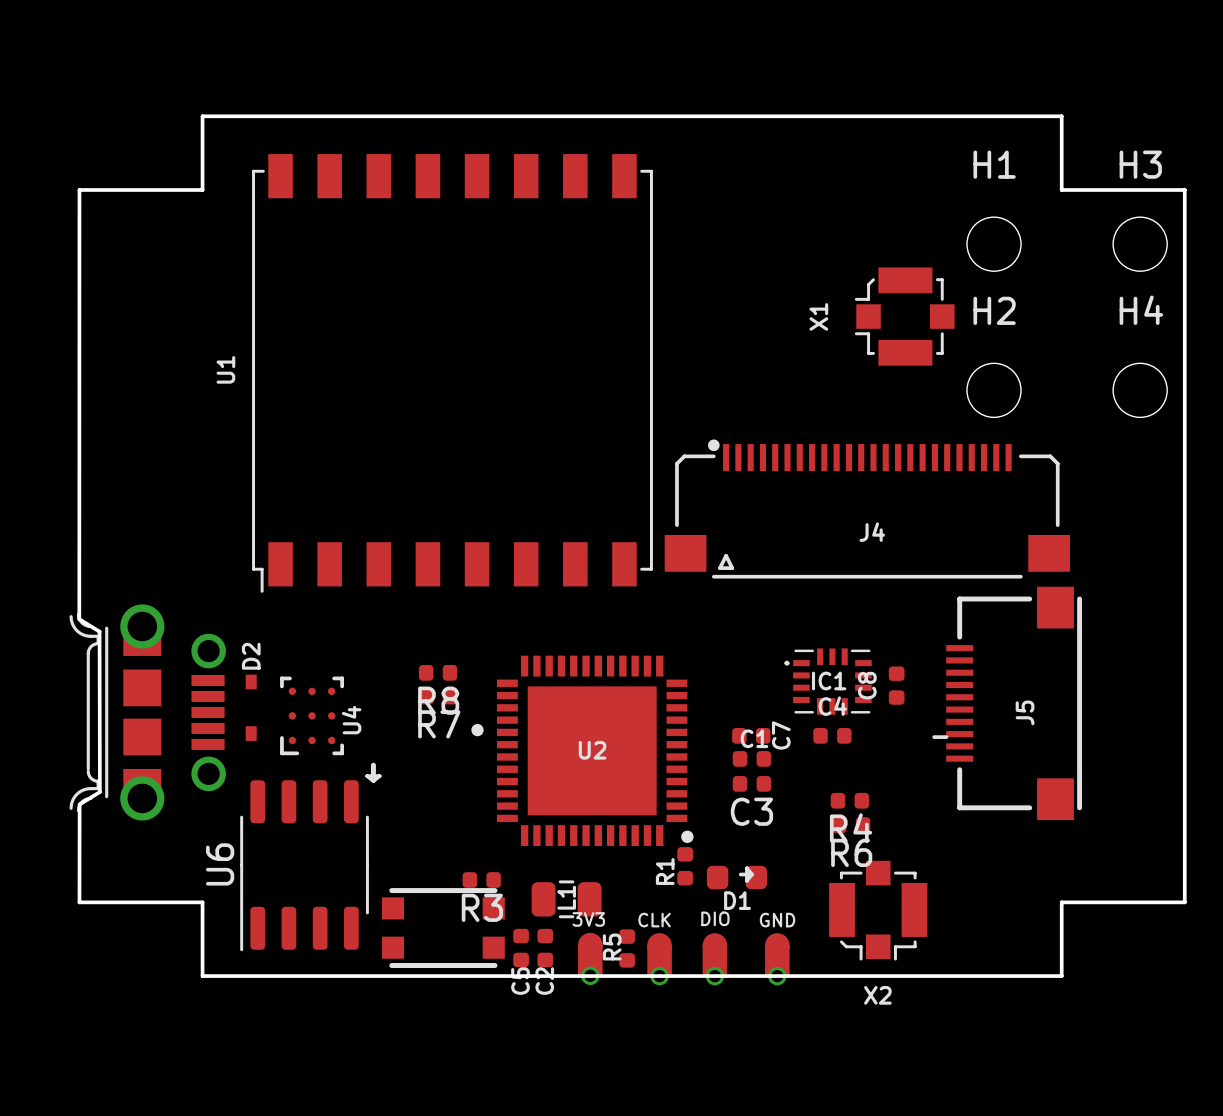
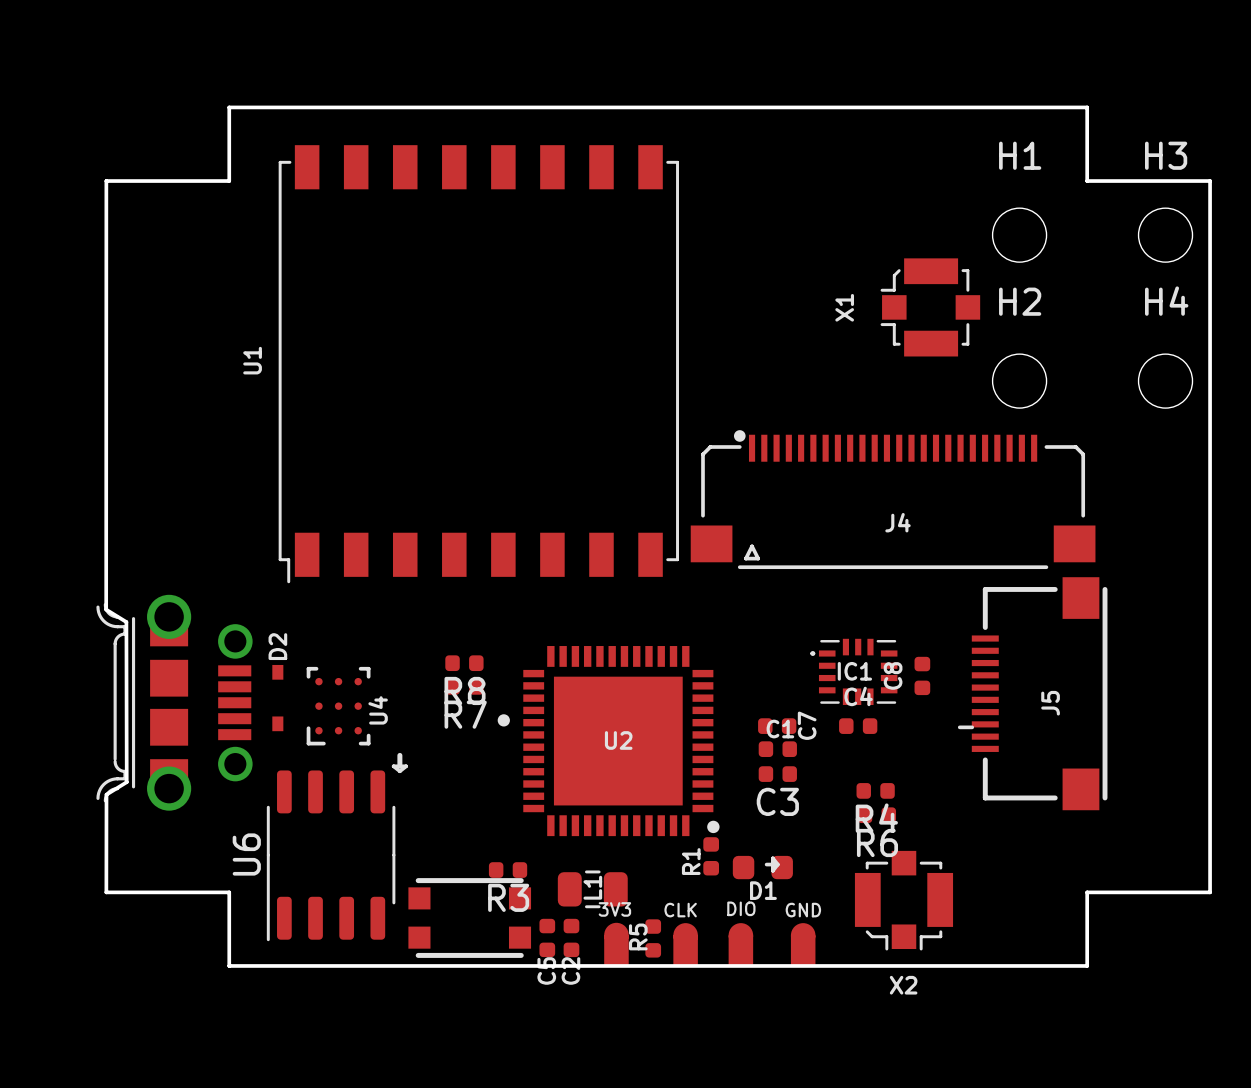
part footprint: [578, 932, 603, 986] -> [604, 922, 629, 966]
part footprint: [647, 933, 672, 986] -> [673, 923, 698, 967]
part footprint: [702, 933, 728, 986] -> [728, 923, 754, 967]
part footprint: [765, 933, 790, 986] -> [790, 923, 816, 967]

